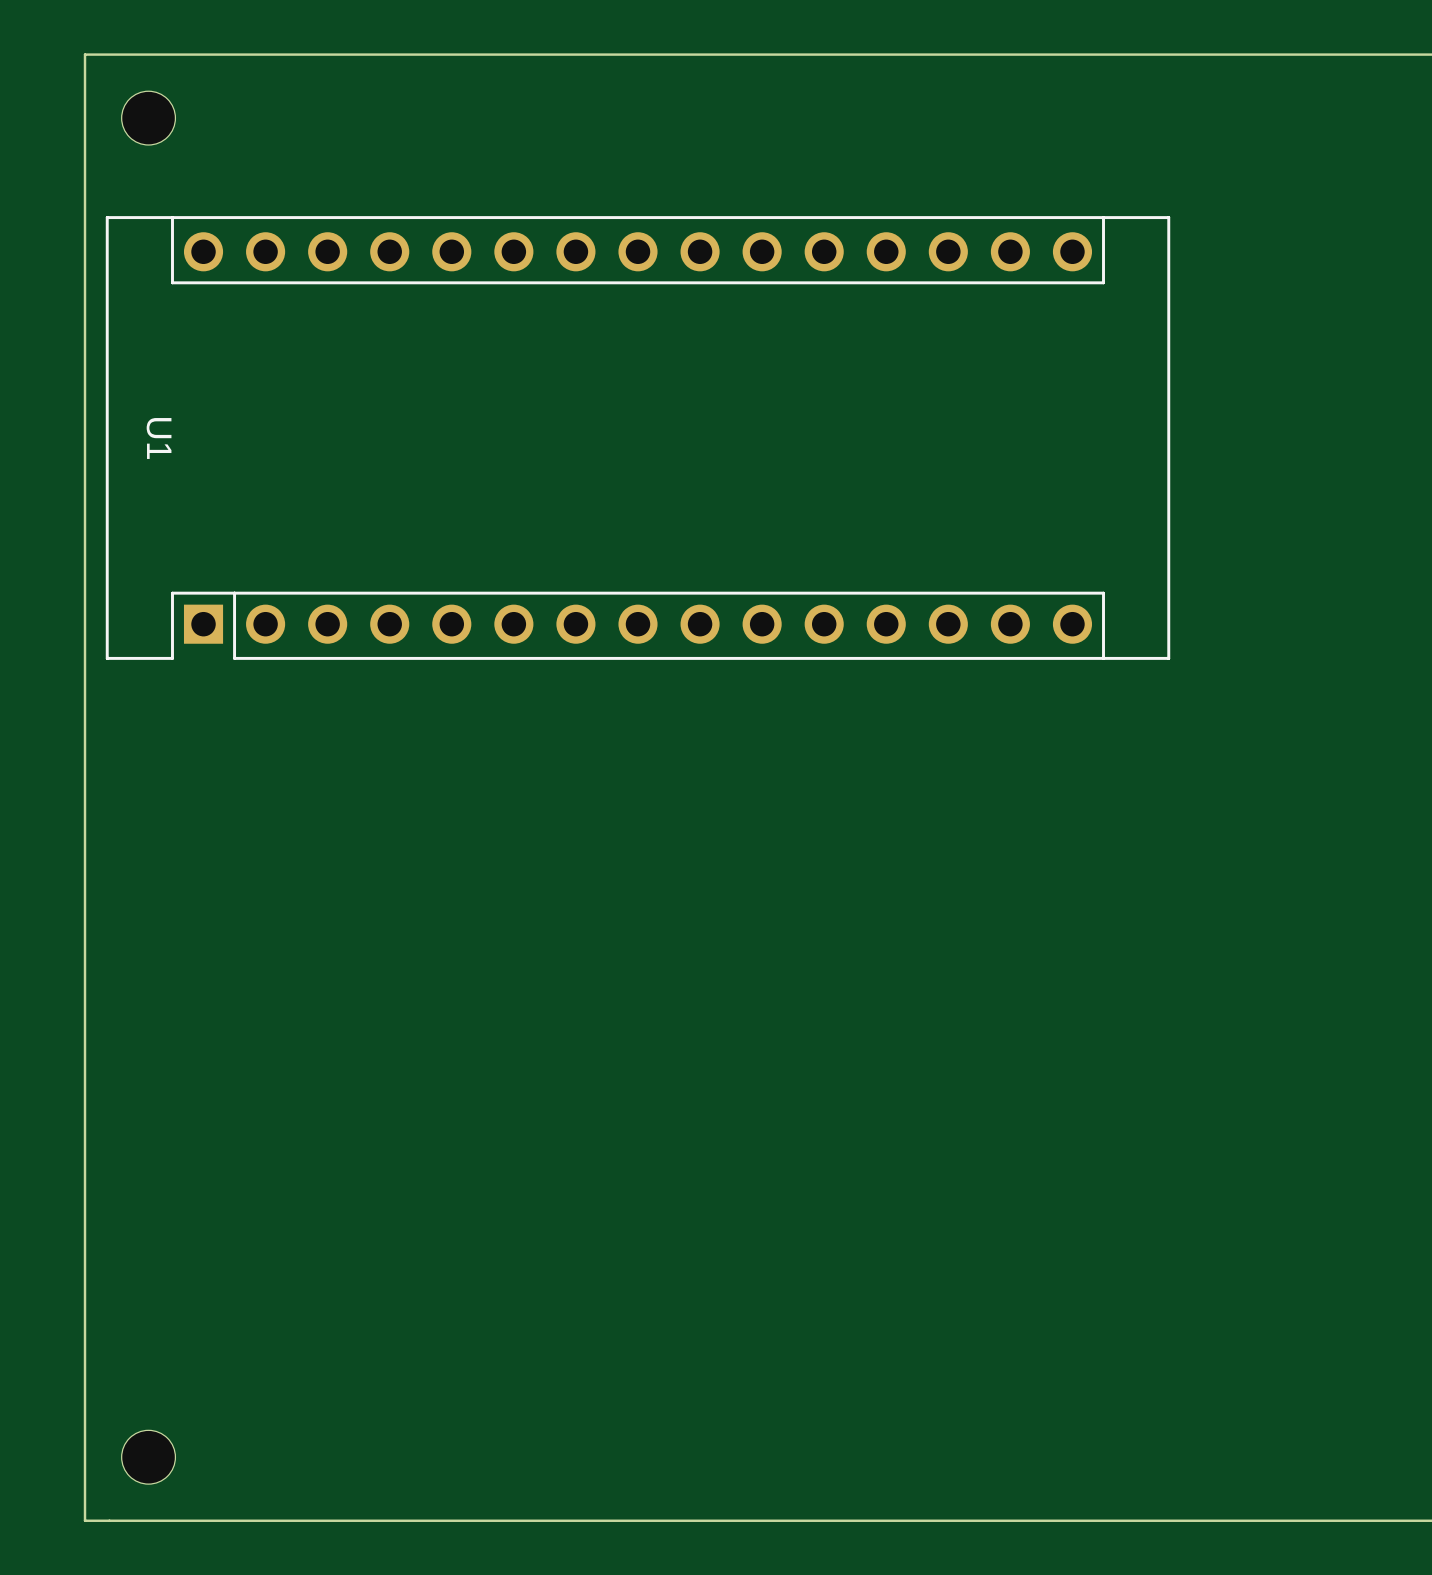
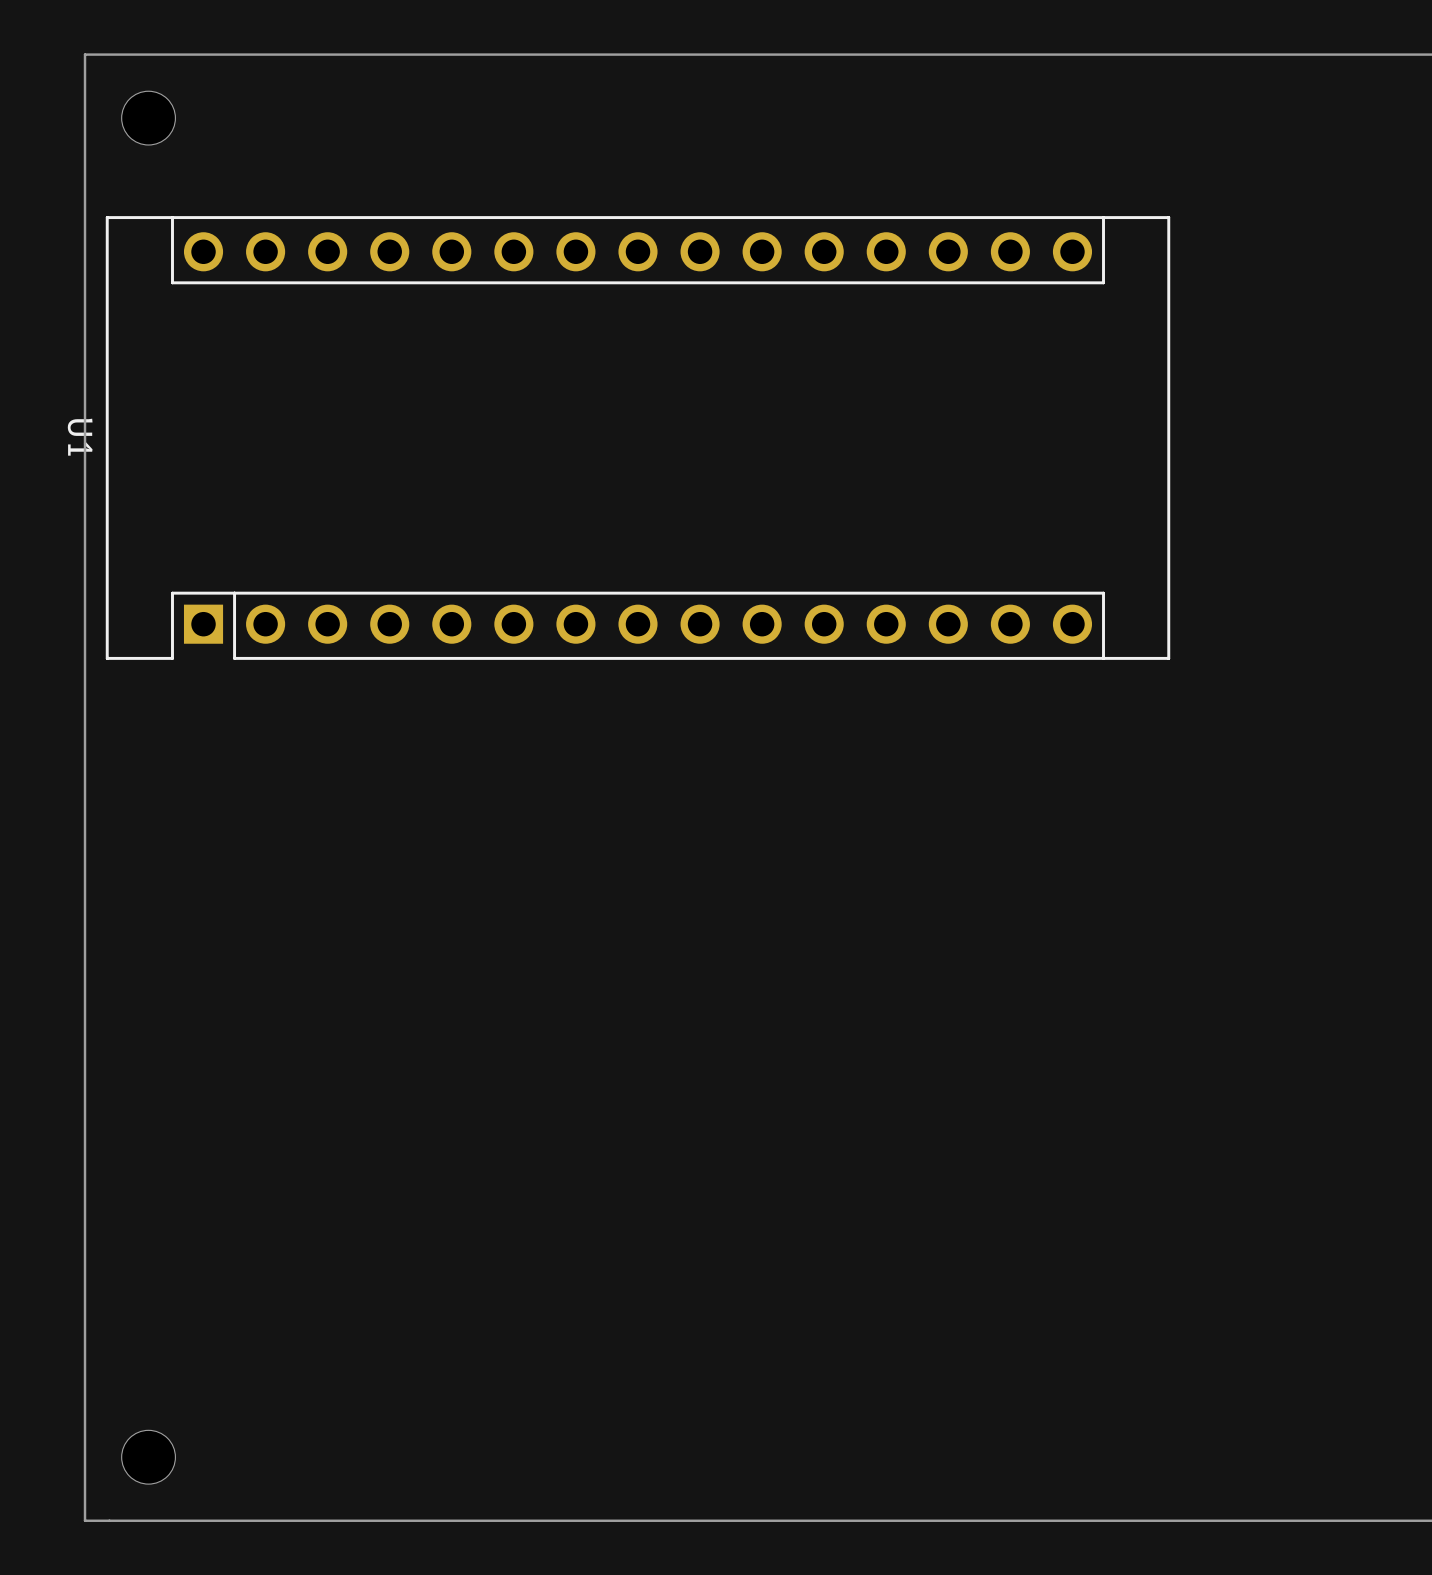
U1 name position: U1 (159, 438) -> U1 (80, 437)

